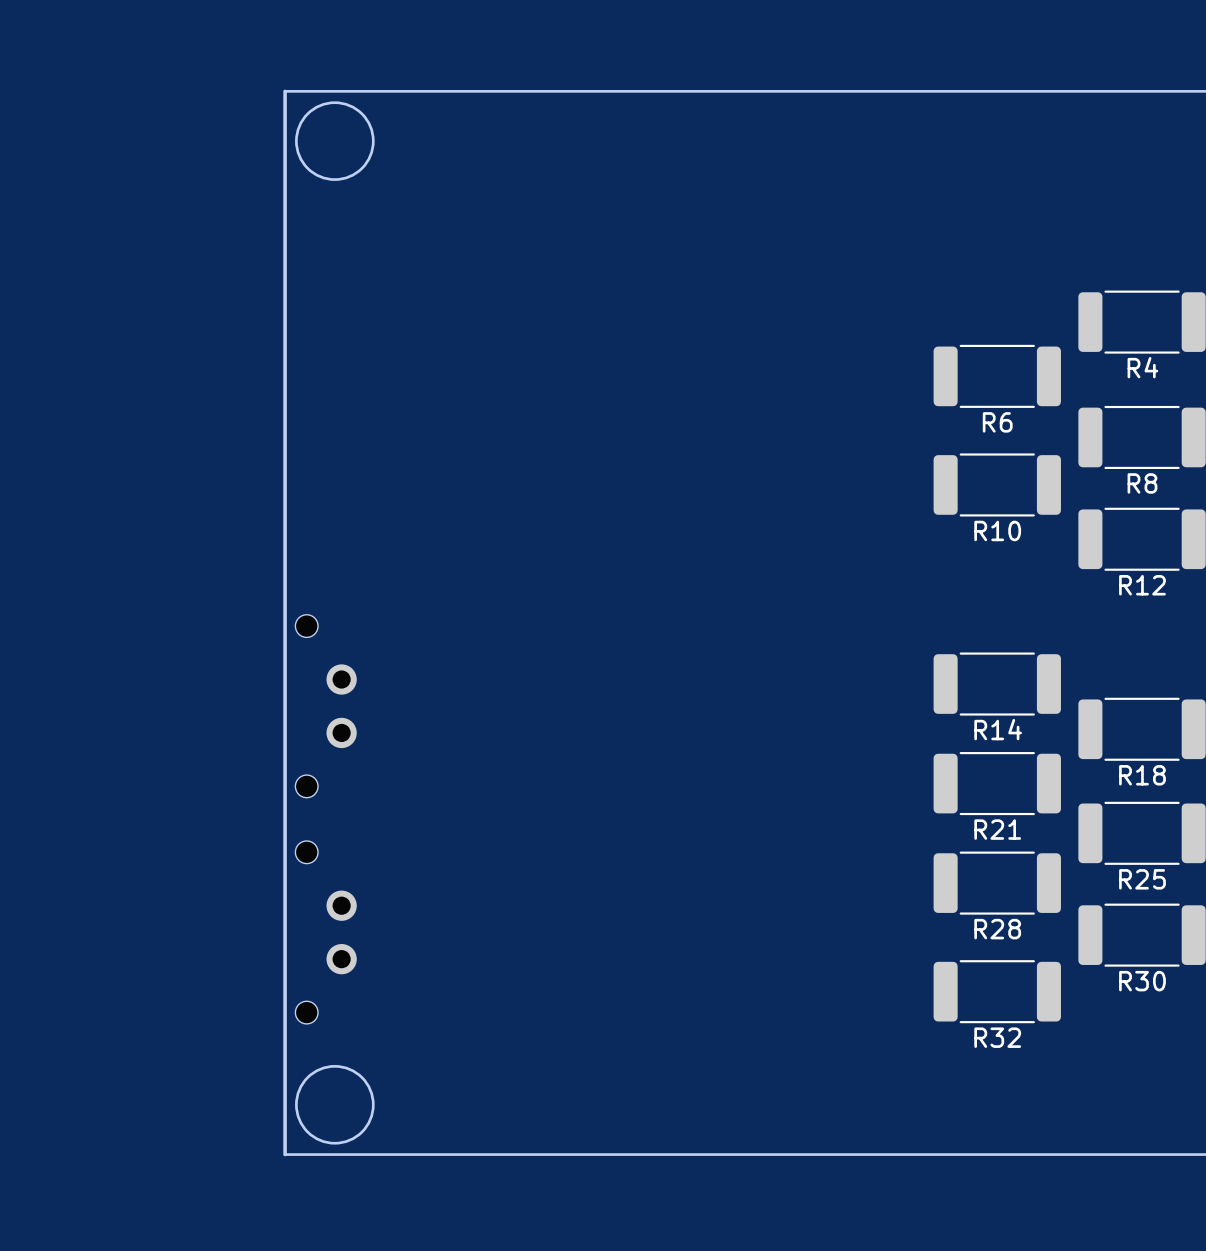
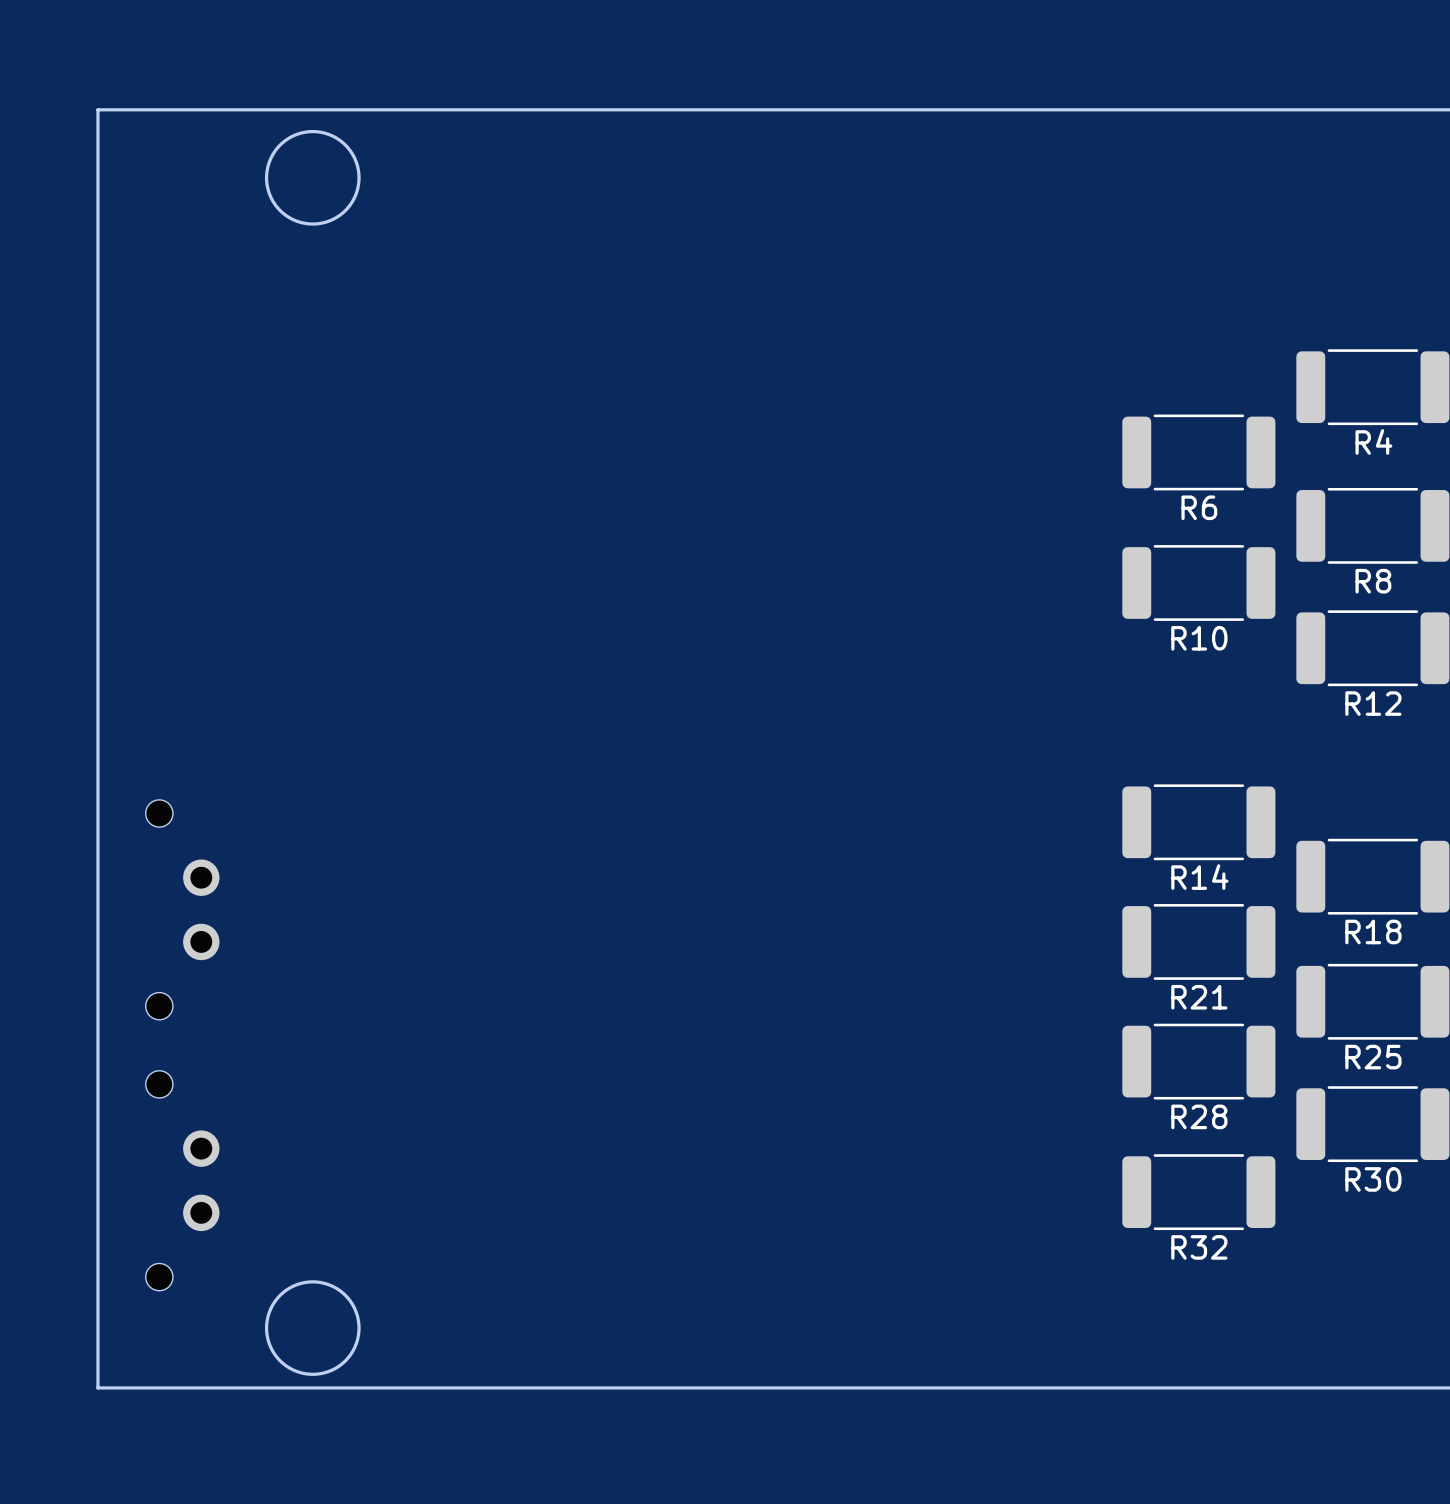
board edge: (285, 91) (285, 1154) -> (342, 109) (97, 109) (97, 1387) (342, 1387)
round board edge position: (334, 141) -> (312, 177)
part: (326, 706) -> none
part: none -> (182, 909)
part: (326, 932) -> none
part: none -> (182, 1180)
round board edge position: (334, 1104) -> (312, 1328)

